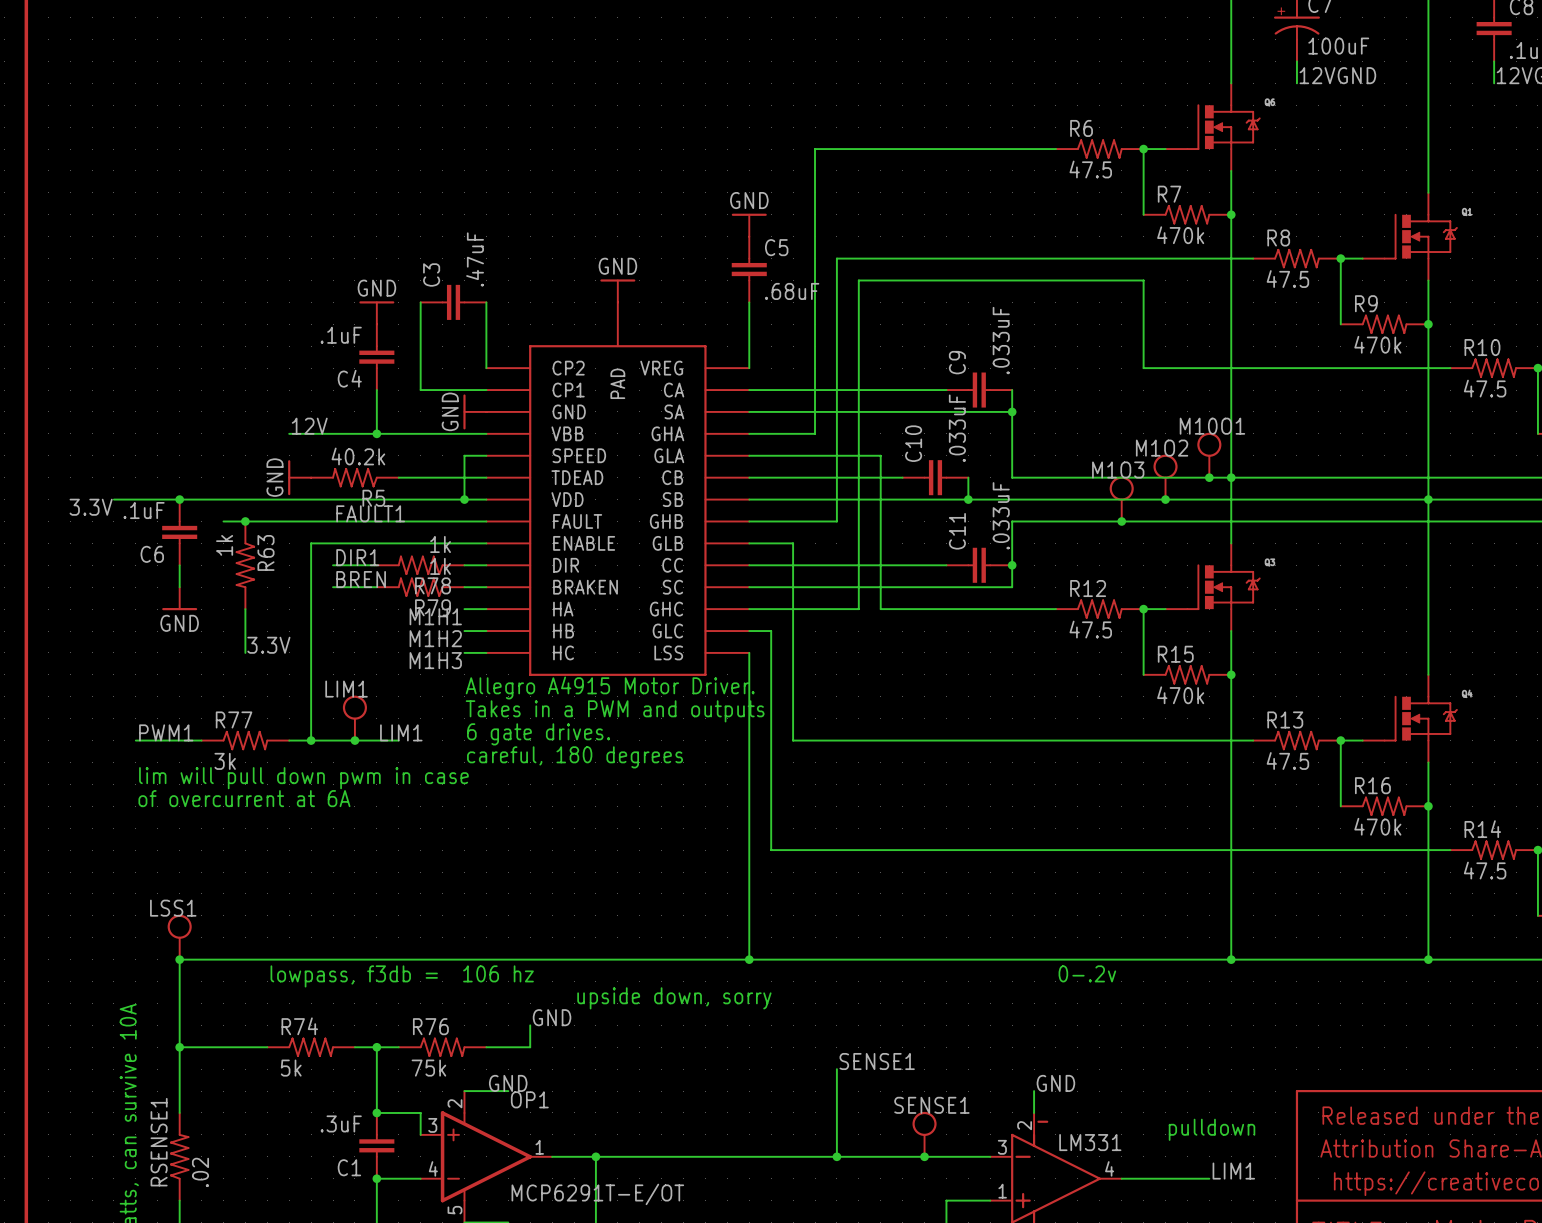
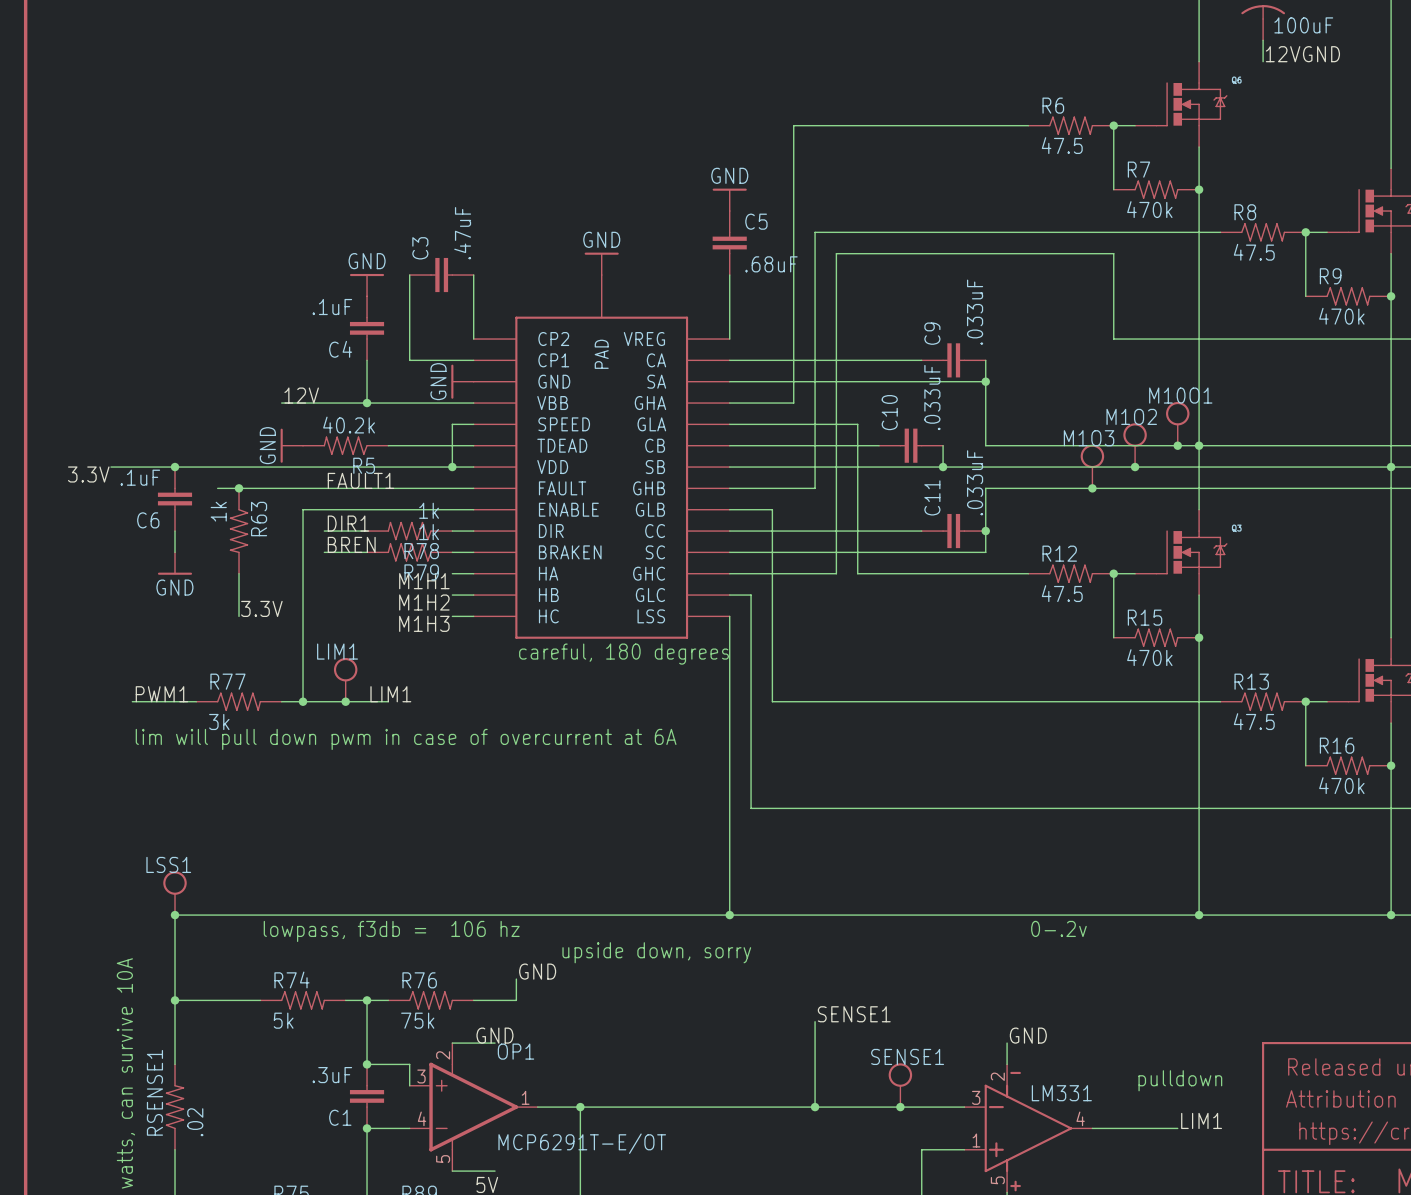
text: Allegro A4915 Motor Driver. (610, 687) -> none
text: Takes in a PWM and outputs (615, 711) -> none
text: 6 gate drives. (538, 734) -> none
text position: careful, 180 degrees (575, 757) -> careful, 180 degrees (624, 654)
text: lim will pull down pwm in case (303, 778) -> lim will pull down pwm in case of overcurrent at 6A (406, 739)
text: of overcurrent at 6A (244, 798) -> none

